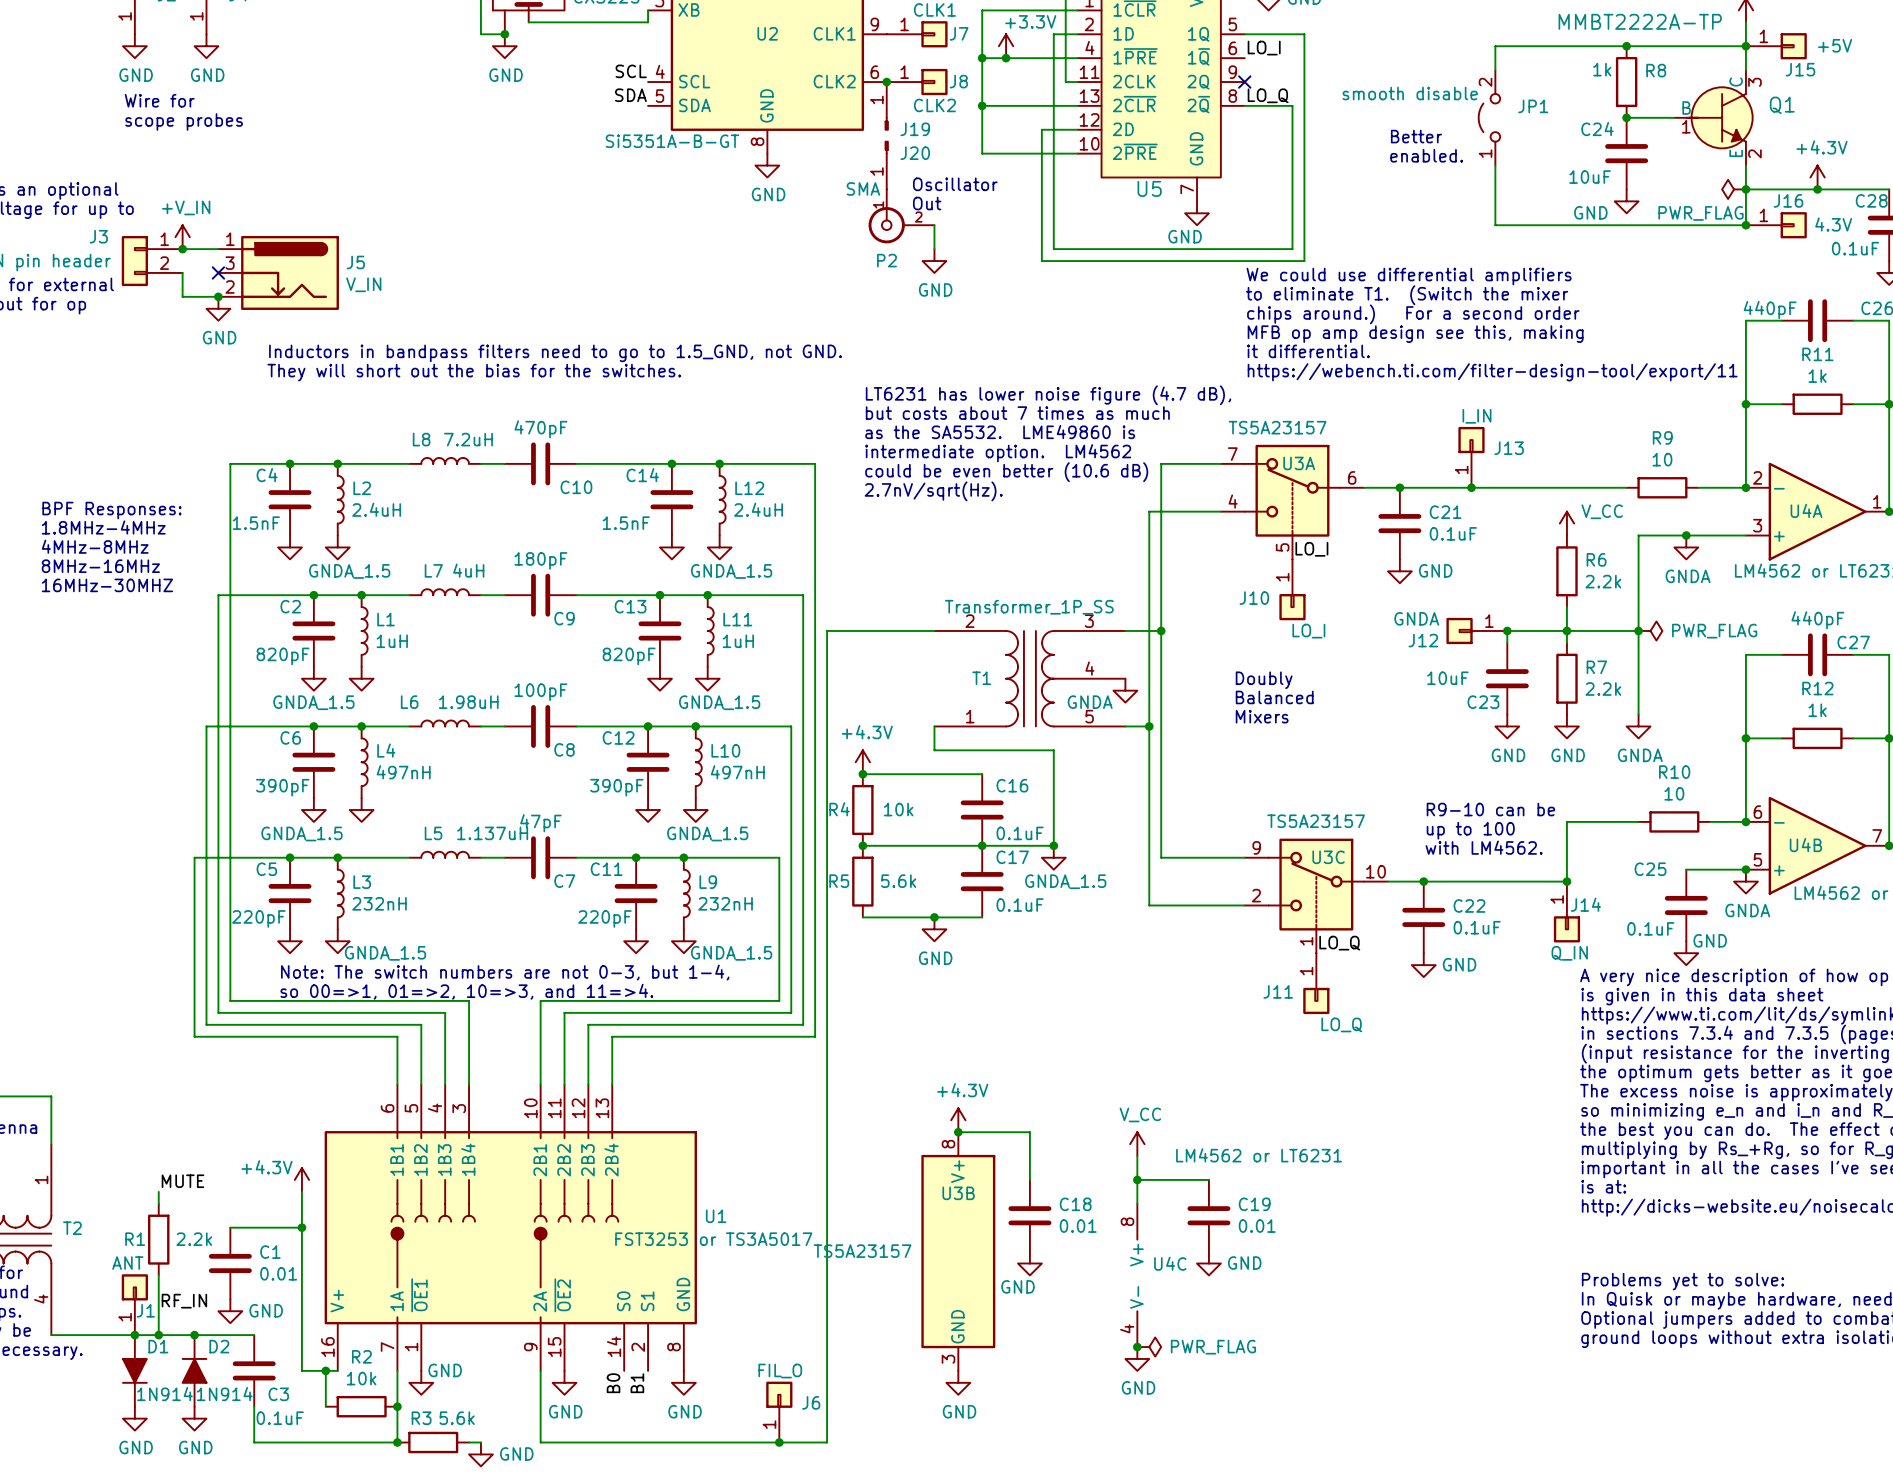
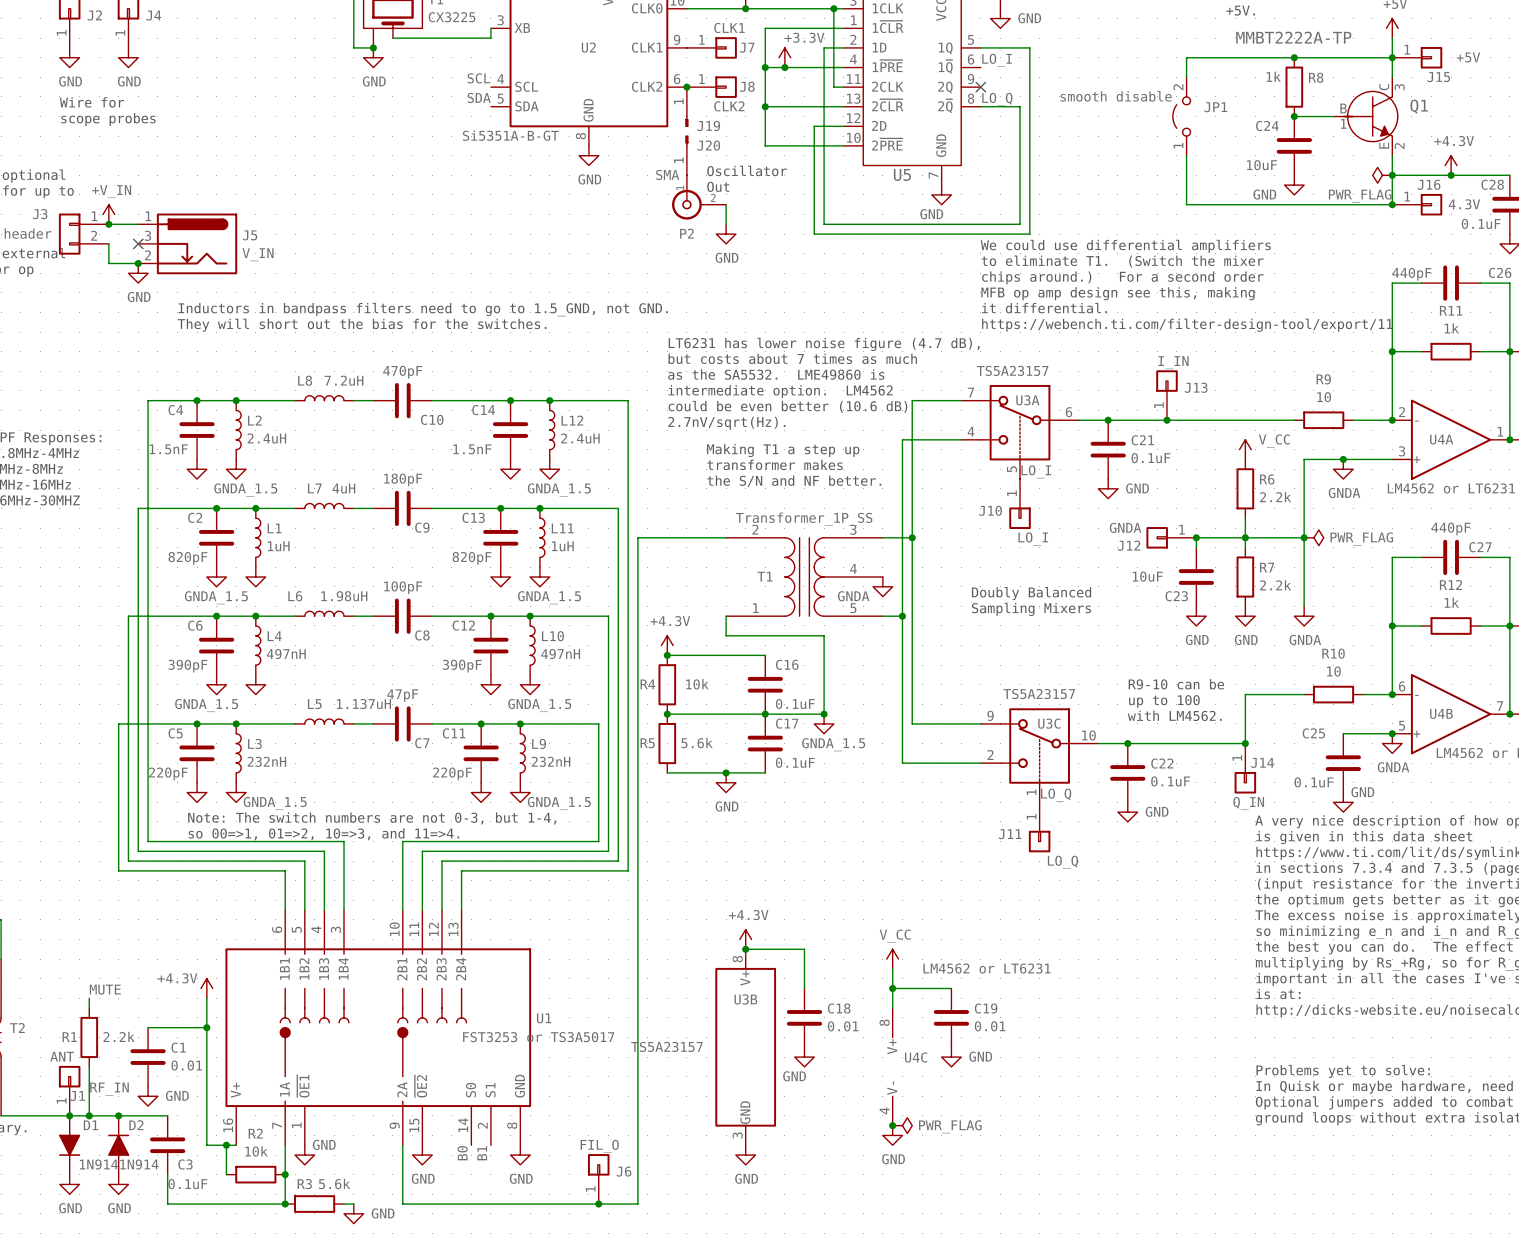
text: Better (1416, 136) -> none
text: enabled. (1426, 155) -> none
text: none -> Making T1 a step up (783, 450)
text: none -> transformer makes (775, 464)
text: none -> the S/N and NF better. (794, 481)
text: Doubly (1264, 680) -> none
text: Balanced (1274, 697) -> Doubly Balanced (1031, 593)
text: Mixers (1262, 716) -> Sampling Mixers (1031, 609)

